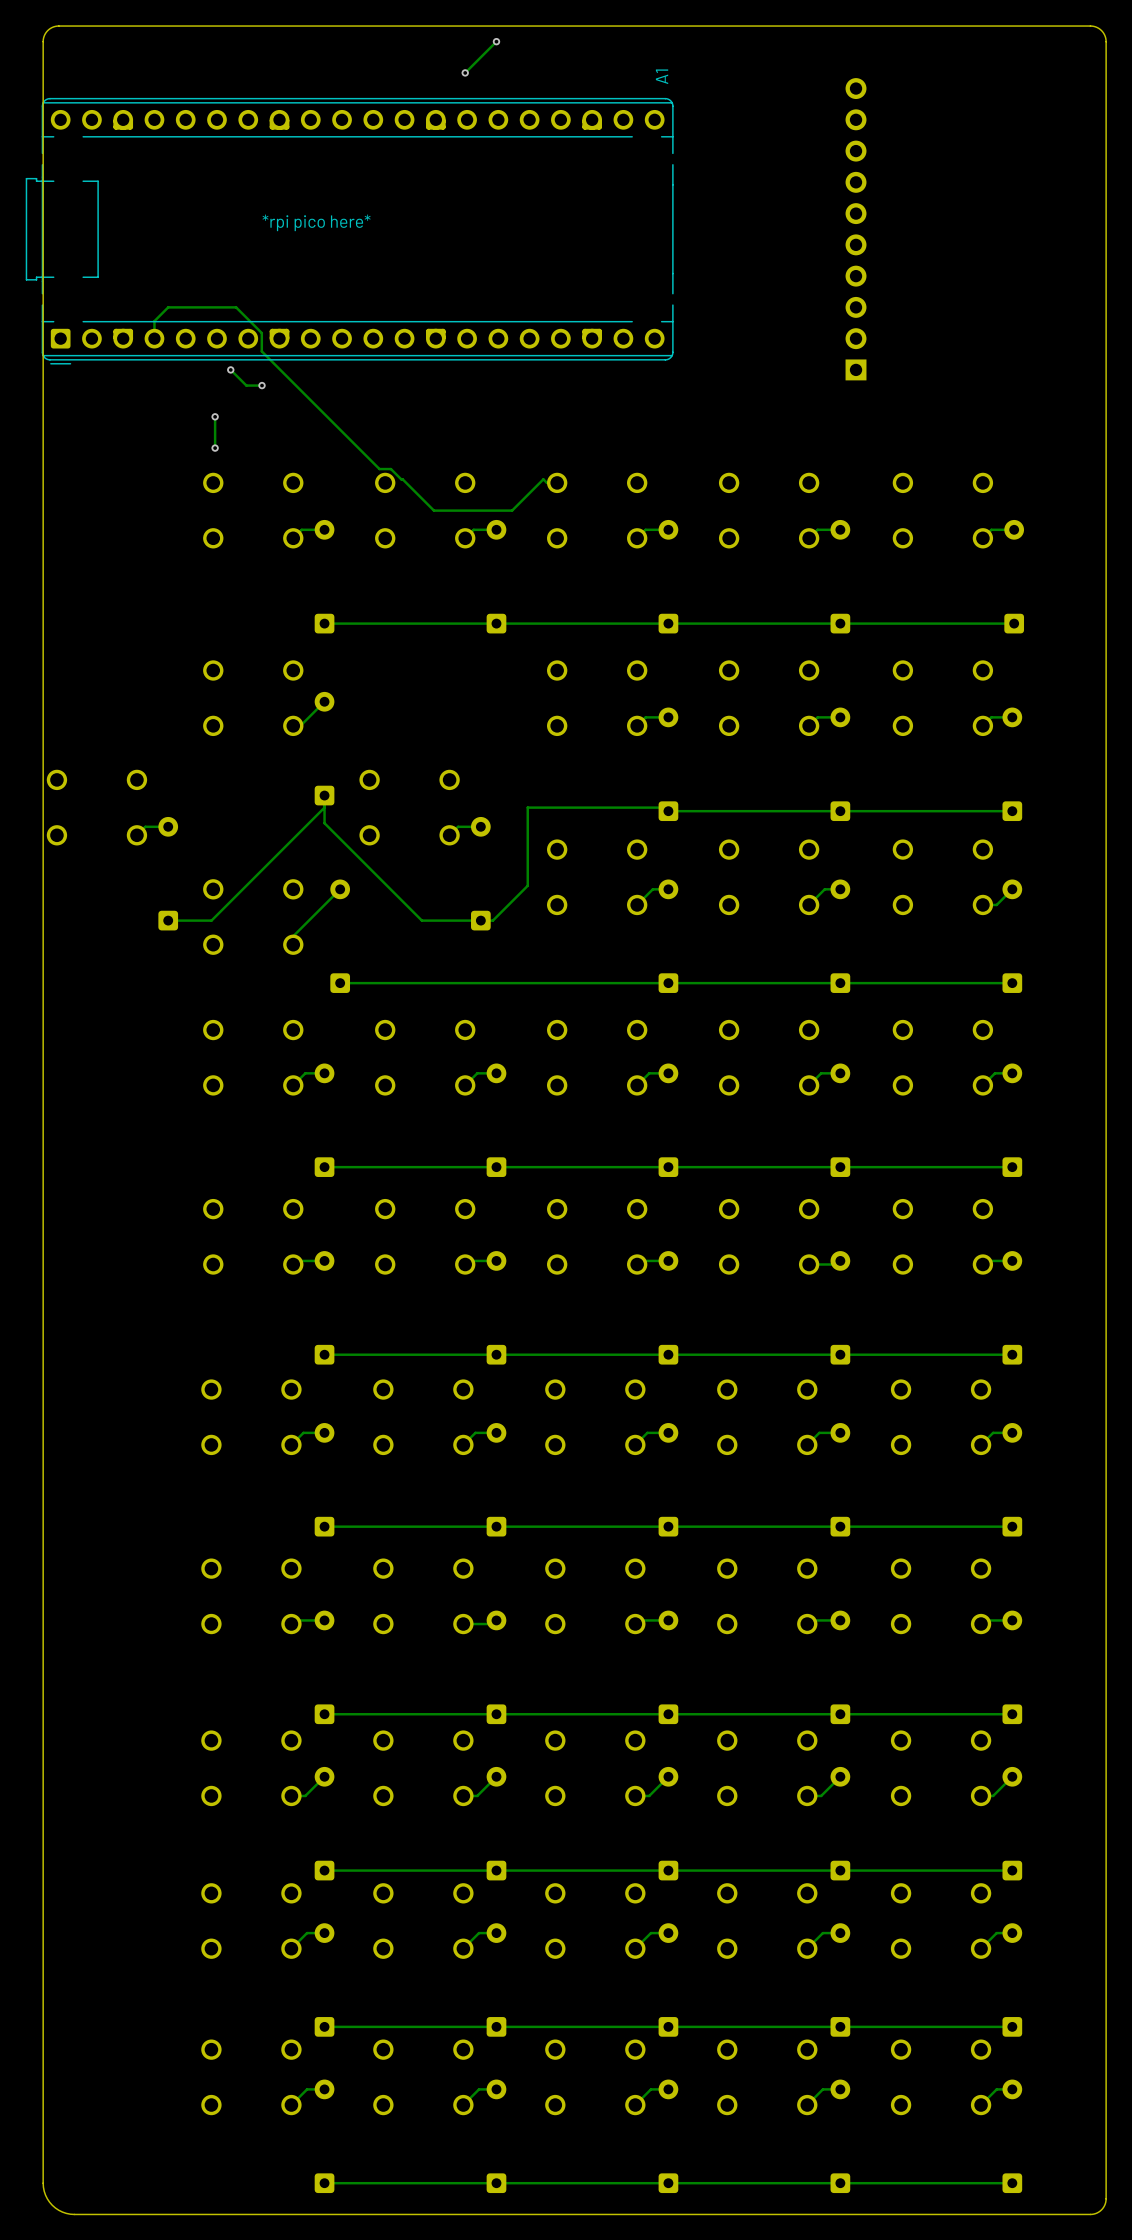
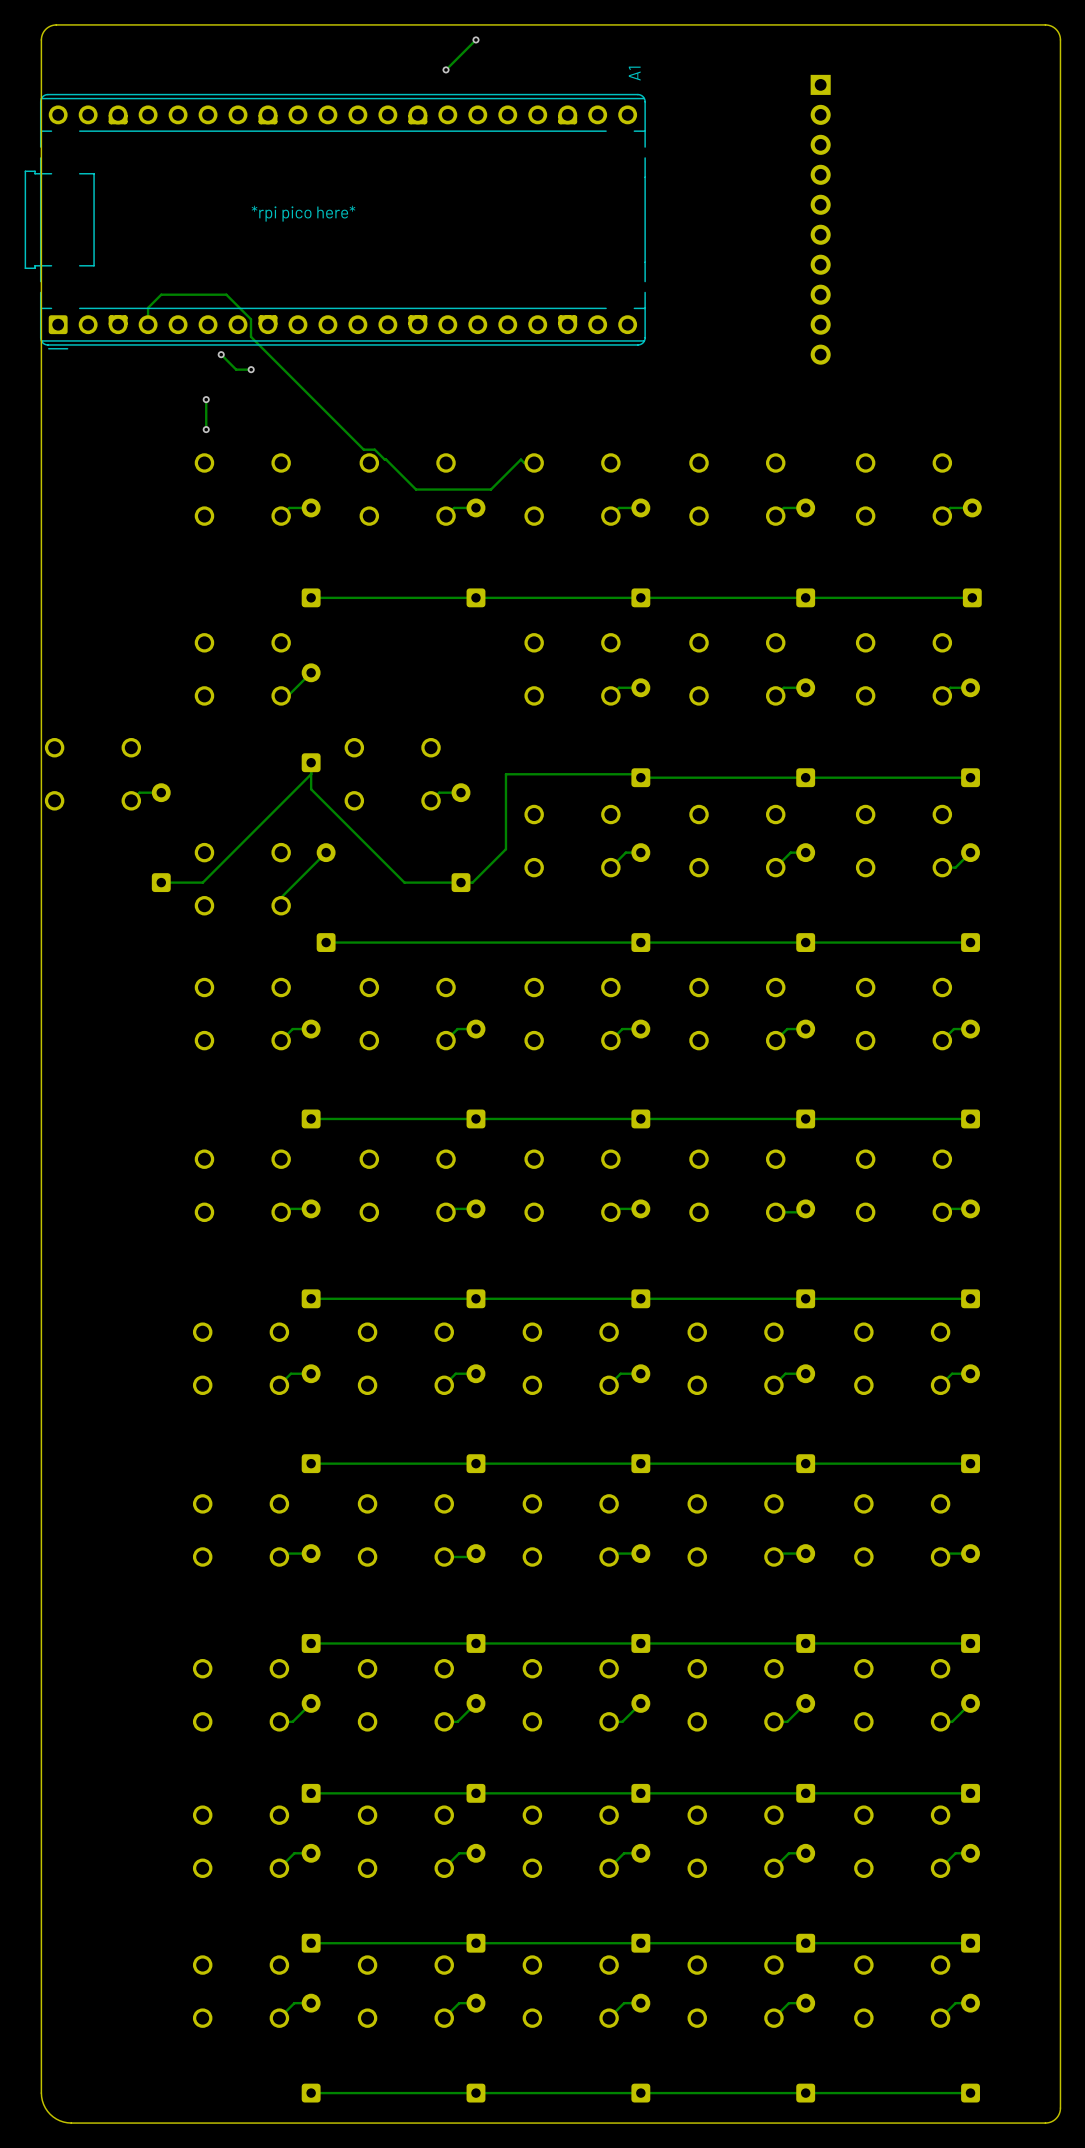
part rotation: 0° (856, 229) -> 180° (820, 219)

